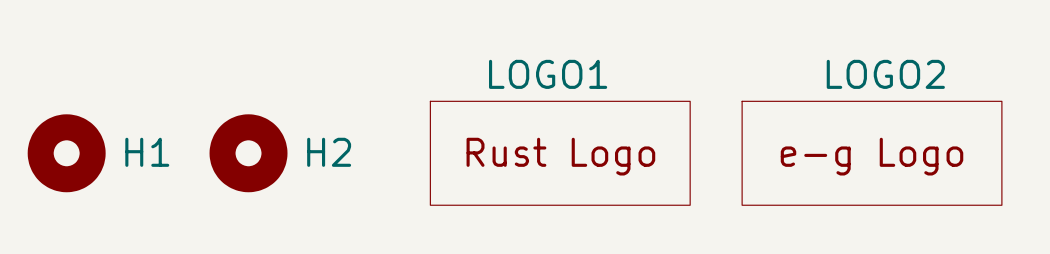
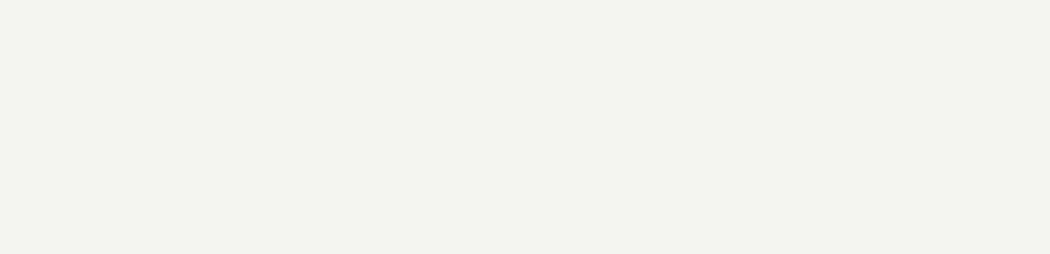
H1: (66, 153) -> none
H2: (248, 153) -> none
LOGO1: (560, 153) -> none
LOGO2: (872, 153) -> none

